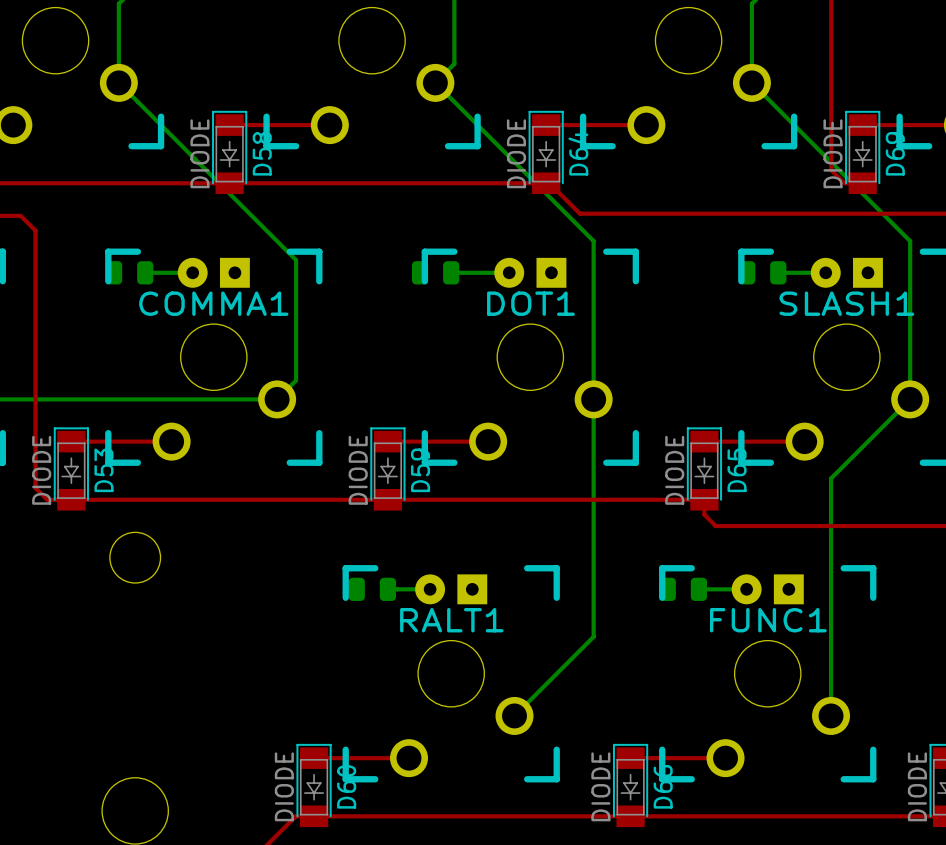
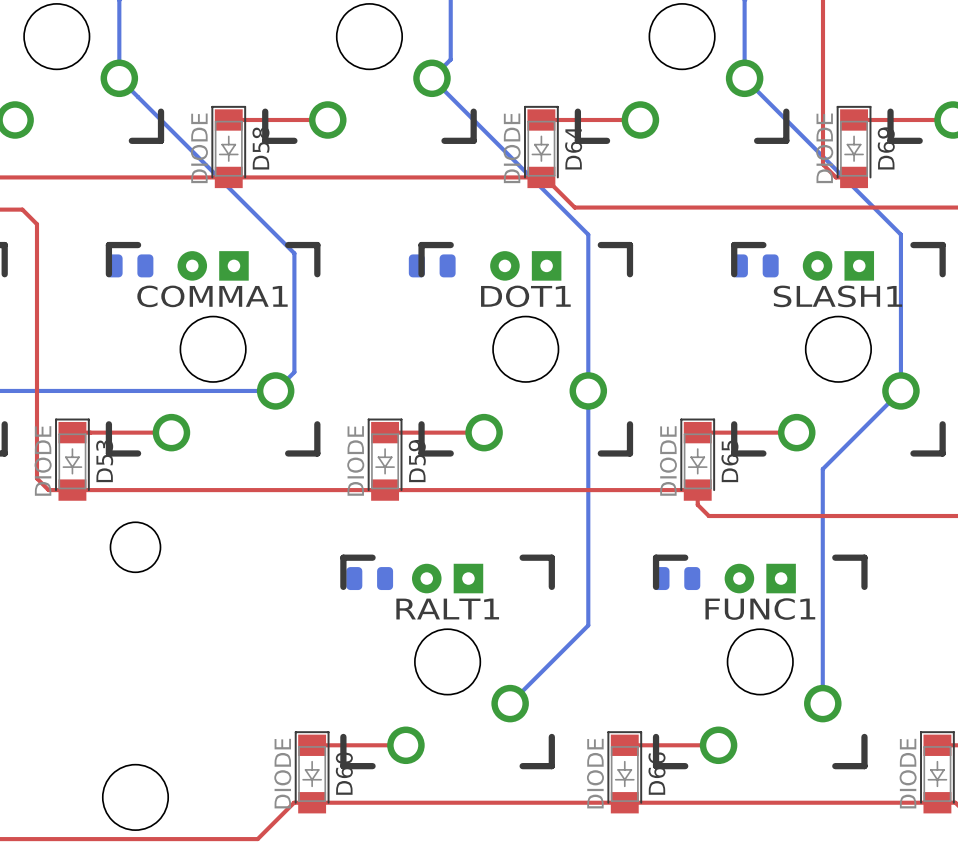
bottom track: (145, 272) (192, 272) -> none
bottom track: (451, 272) (509, 272) -> none
bottom track: (778, 272) (825, 272) -> none
bottom track: (387, 589) (430, 589) -> none
bottom track: (698, 589) (746, 589) -> none

